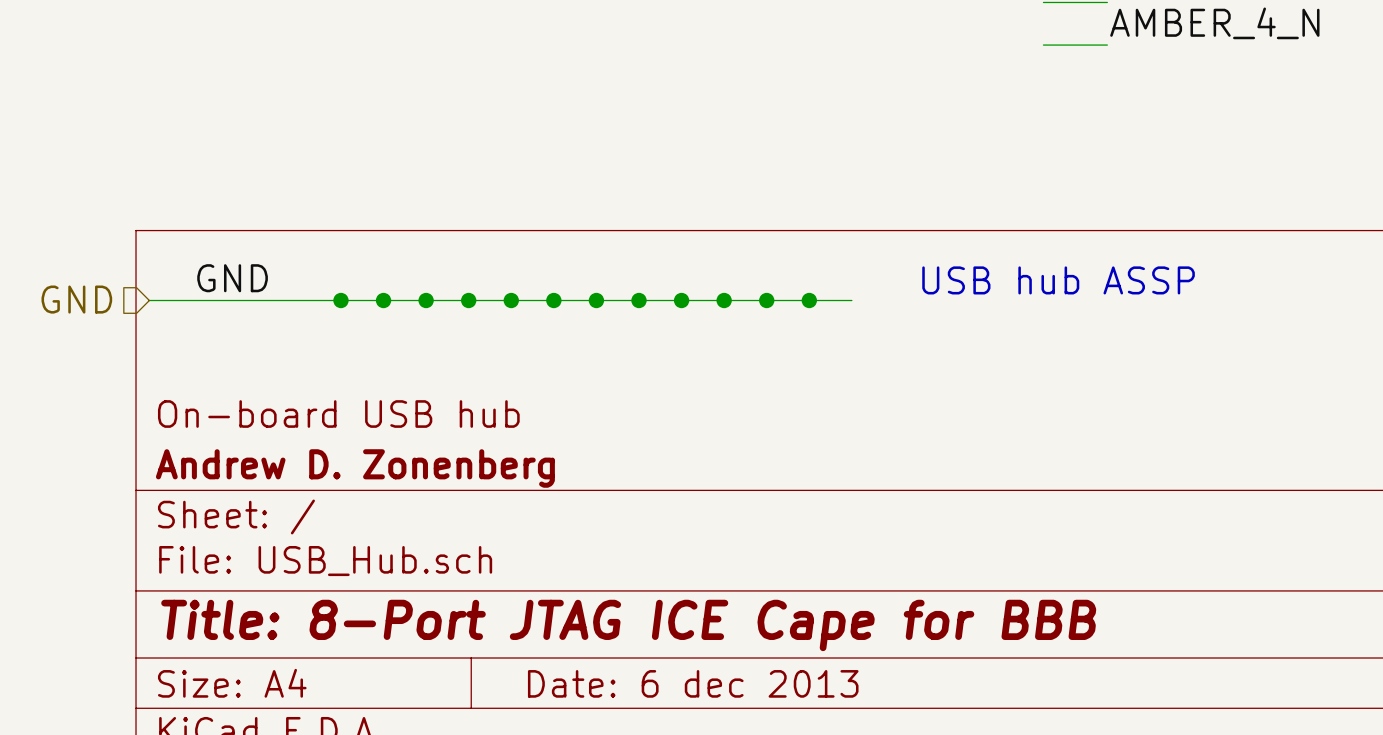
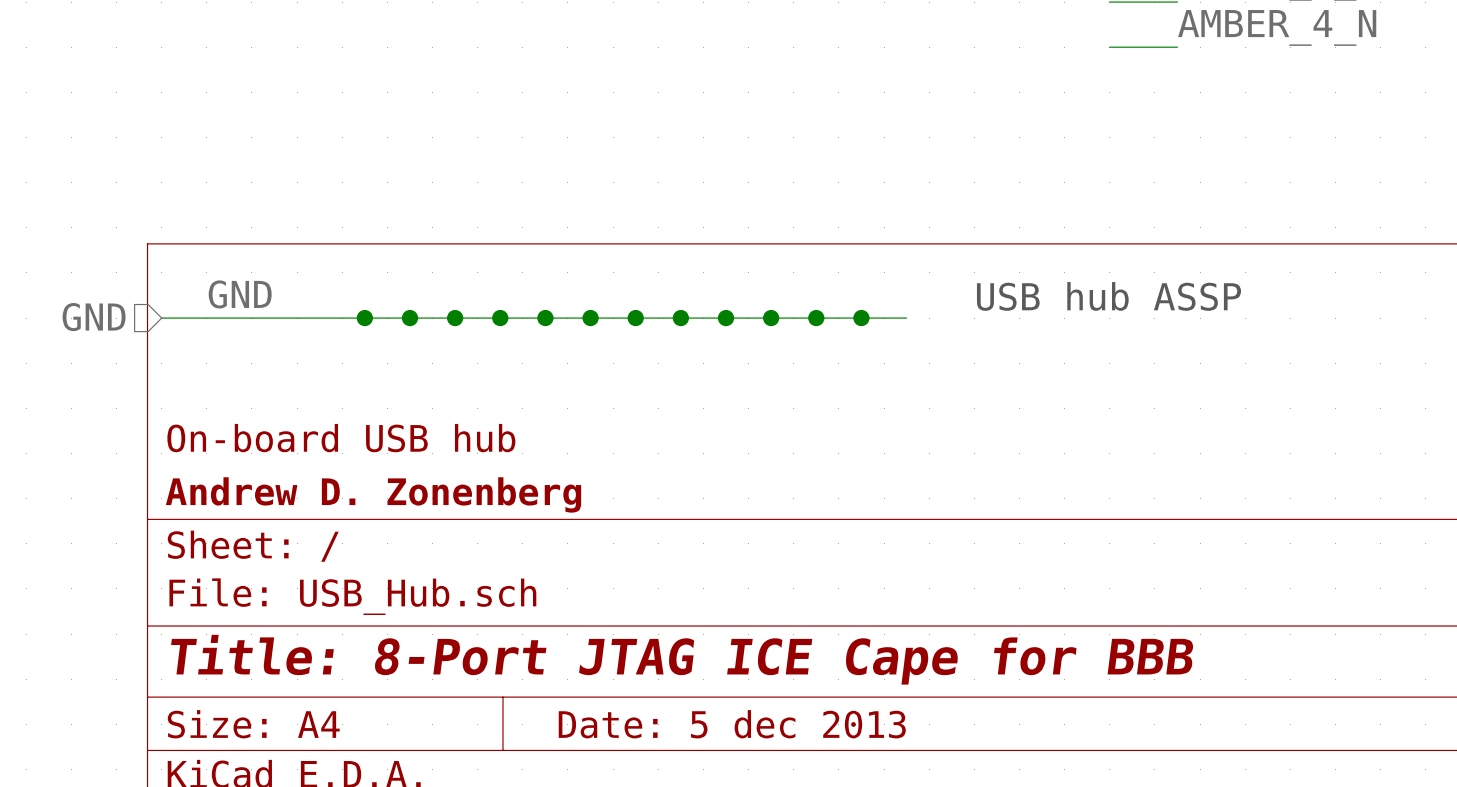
title block: Date: 6 dec 2013 (693, 683) -> Date: 5 dec 2013 (732, 724)

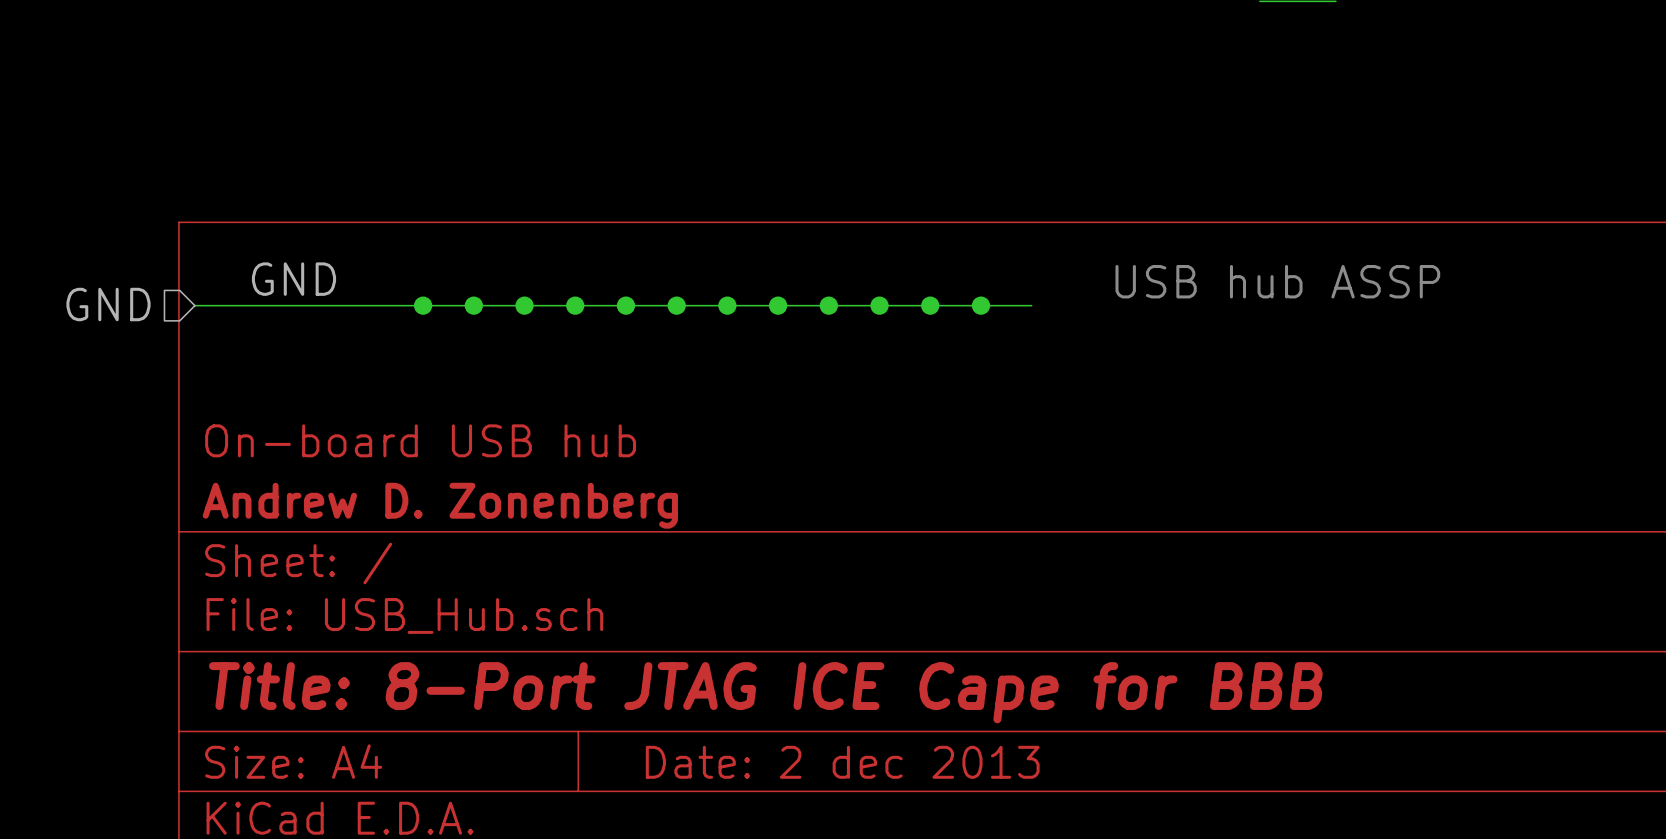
title block: Date: 5 dec 2013 (732, 724) -> Date: 2 dec 2013 (842, 762)

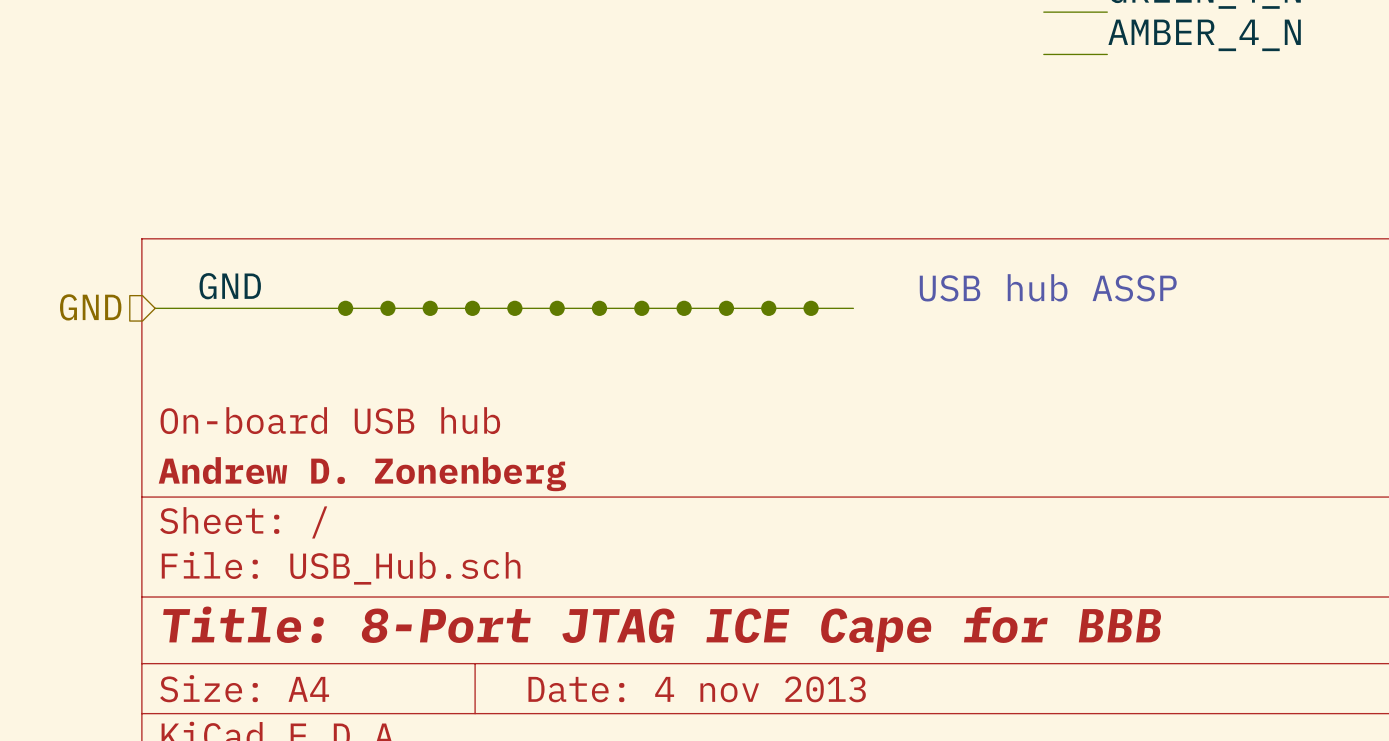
title block: Date: 2 dec 2013 (842, 762) -> Date: 4 nov 2013 (697, 689)

